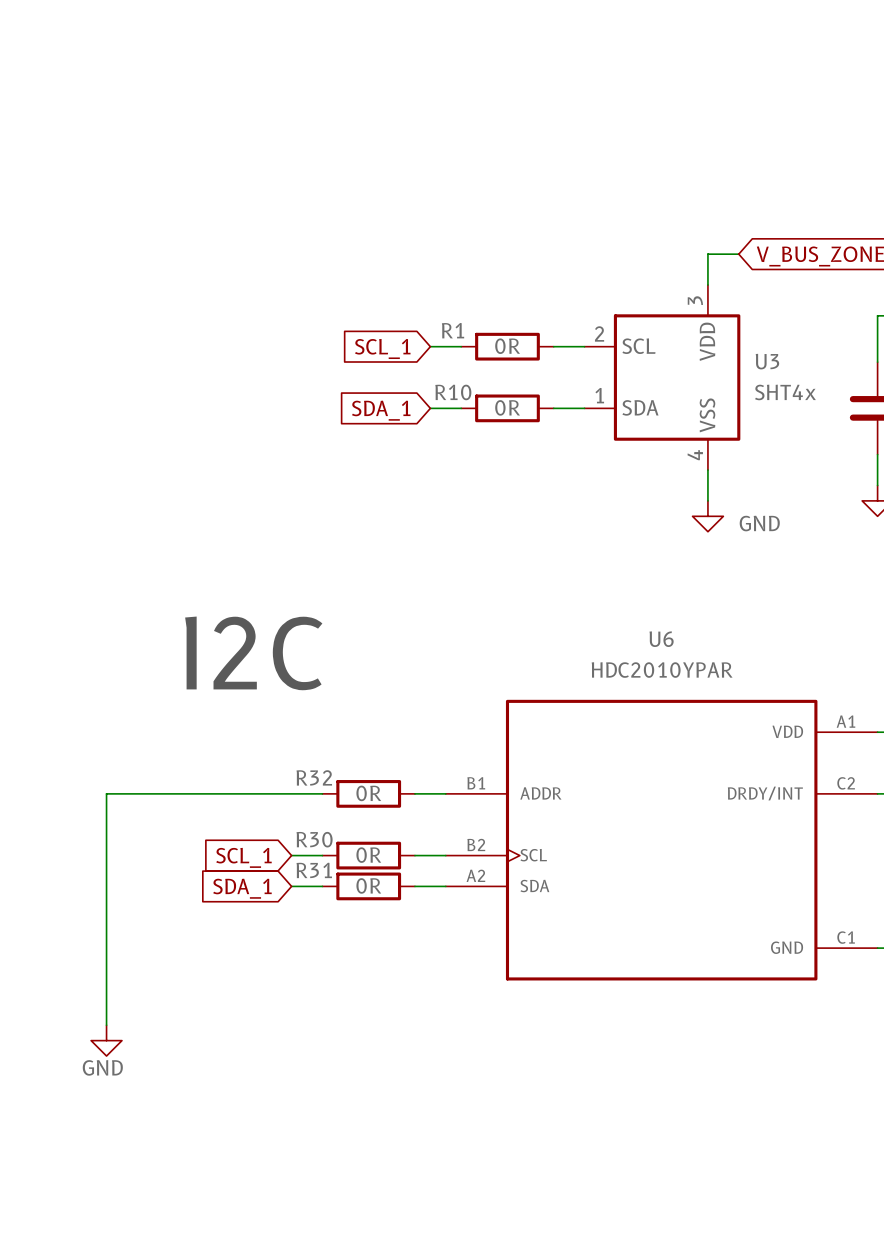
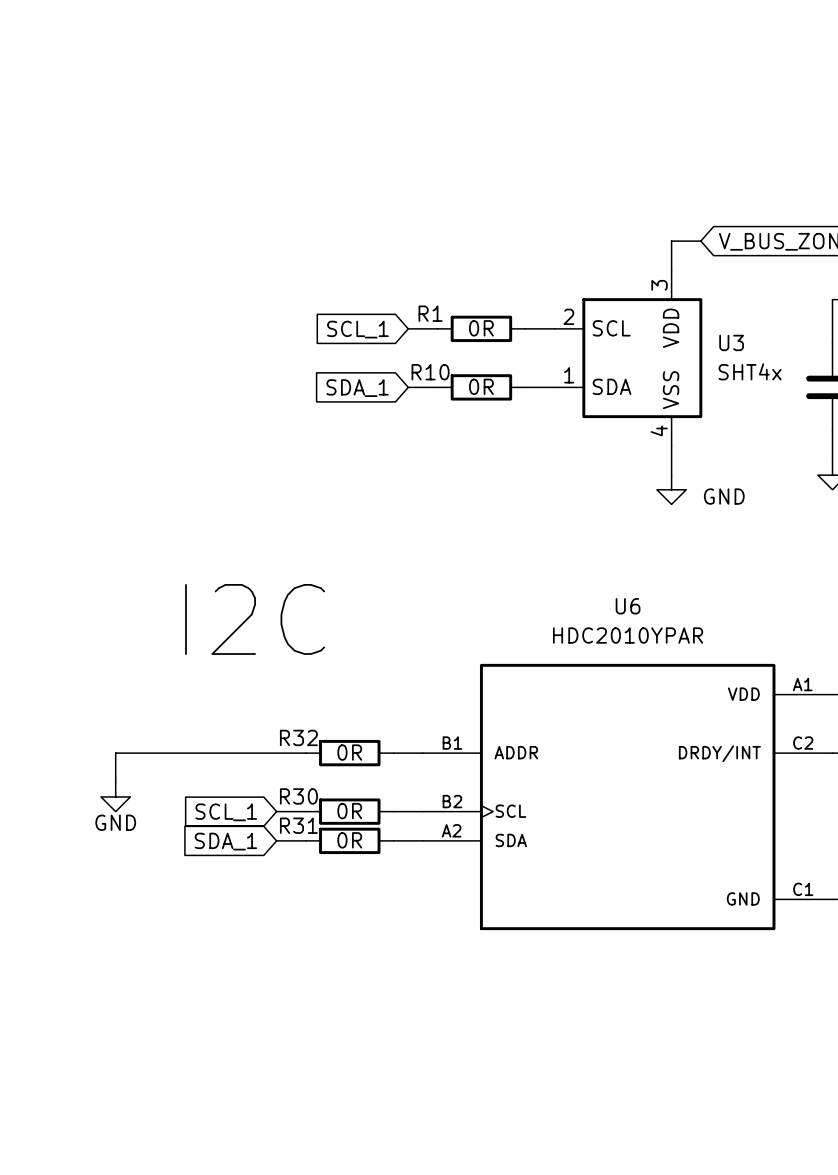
wire: (121, 793) (106, 793) (106, 1025) -> (115, 753) (115, 782)
power symbol position: GND (106, 1040) -> GND (115, 797)

